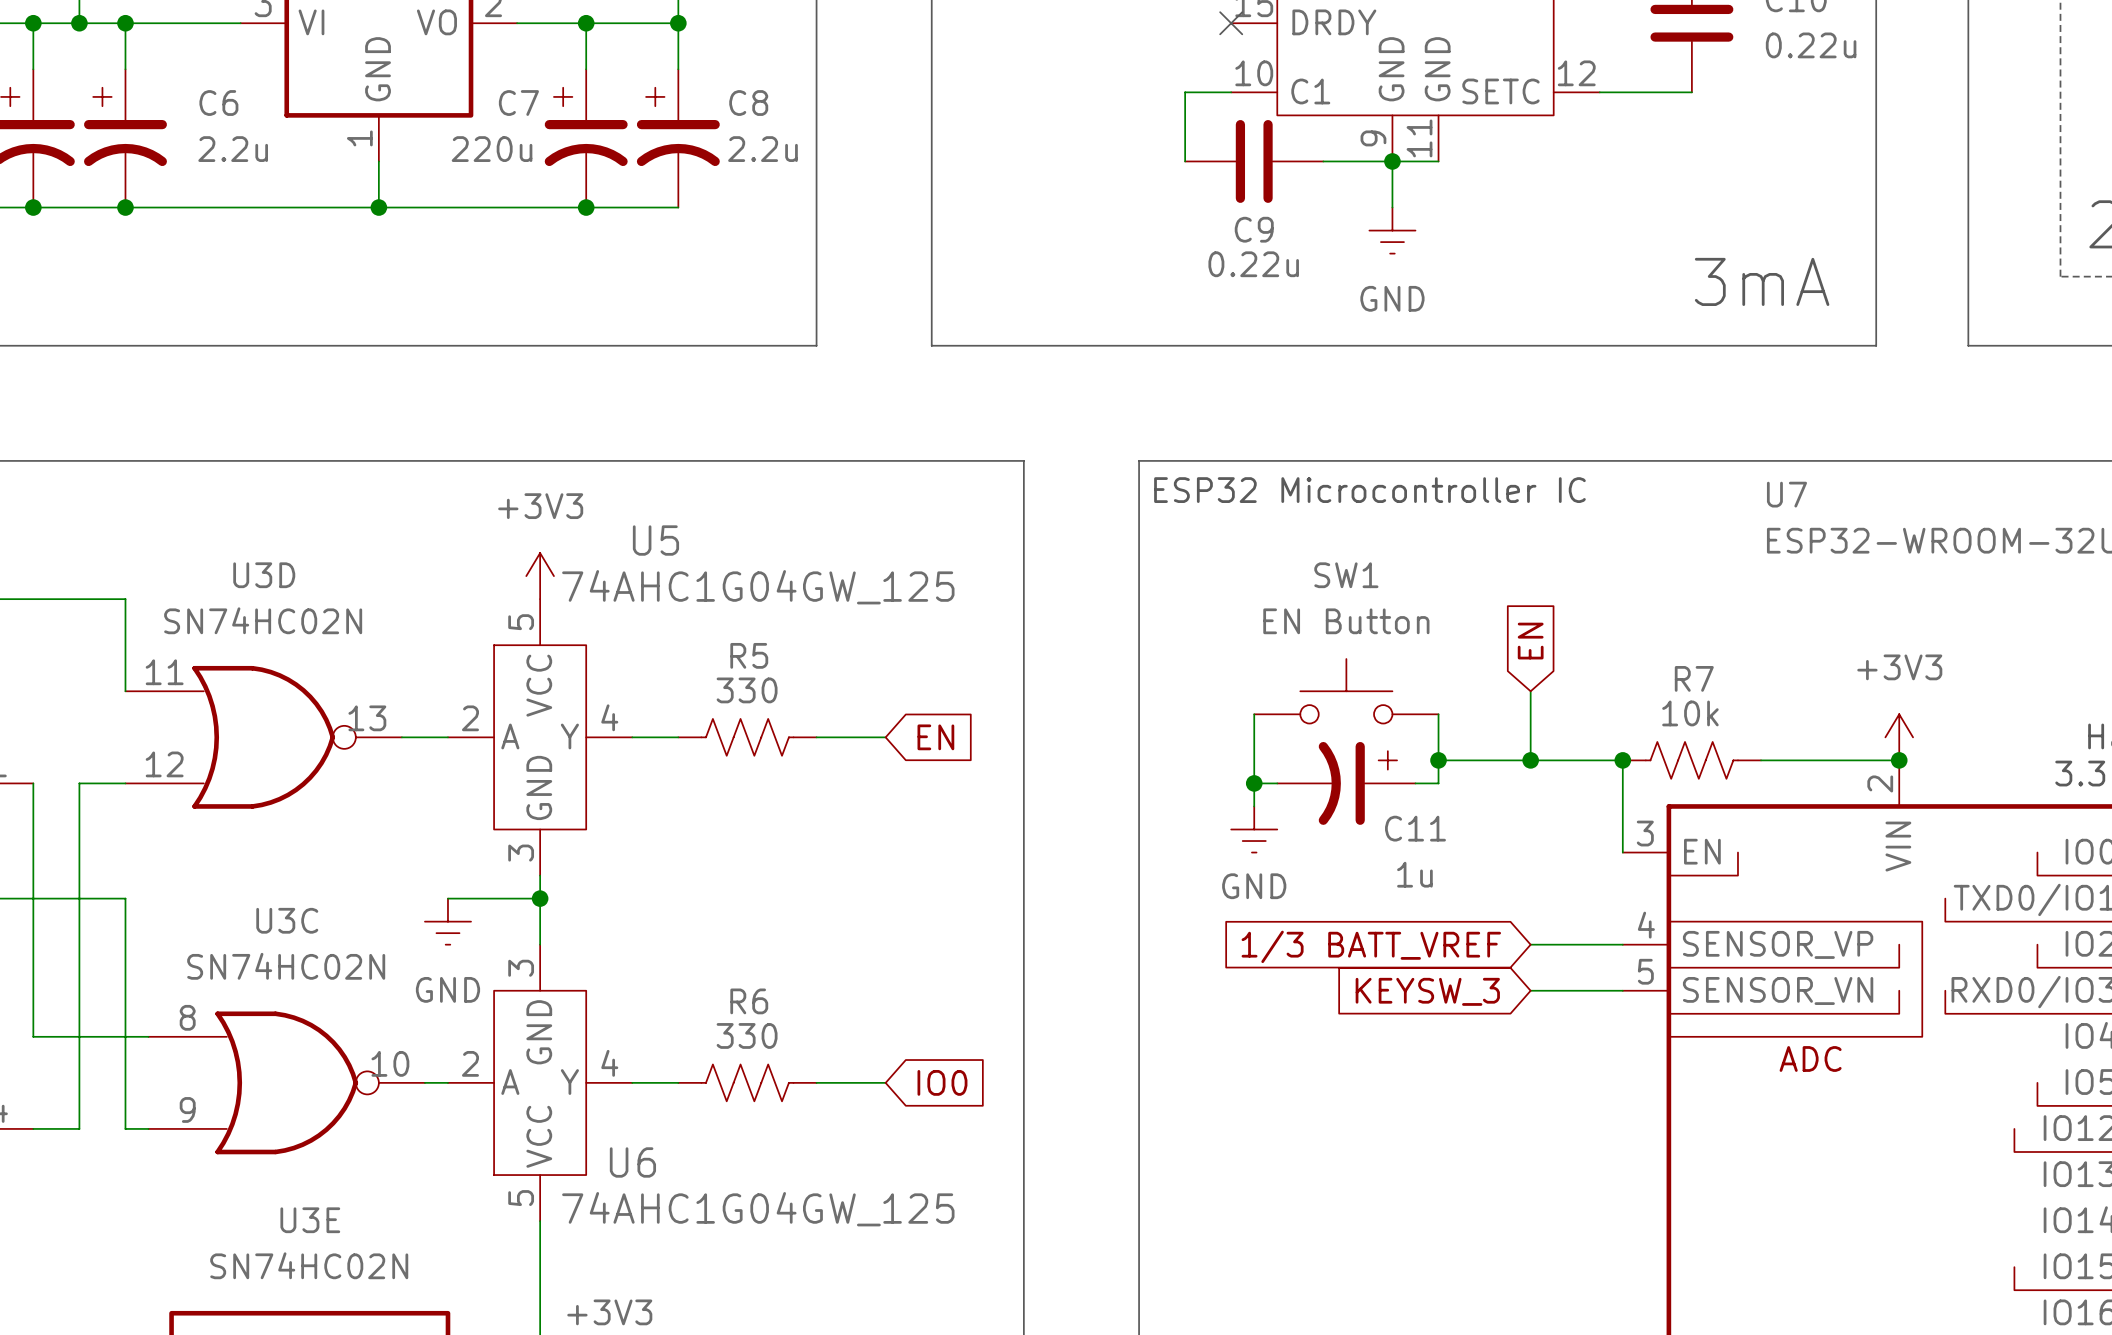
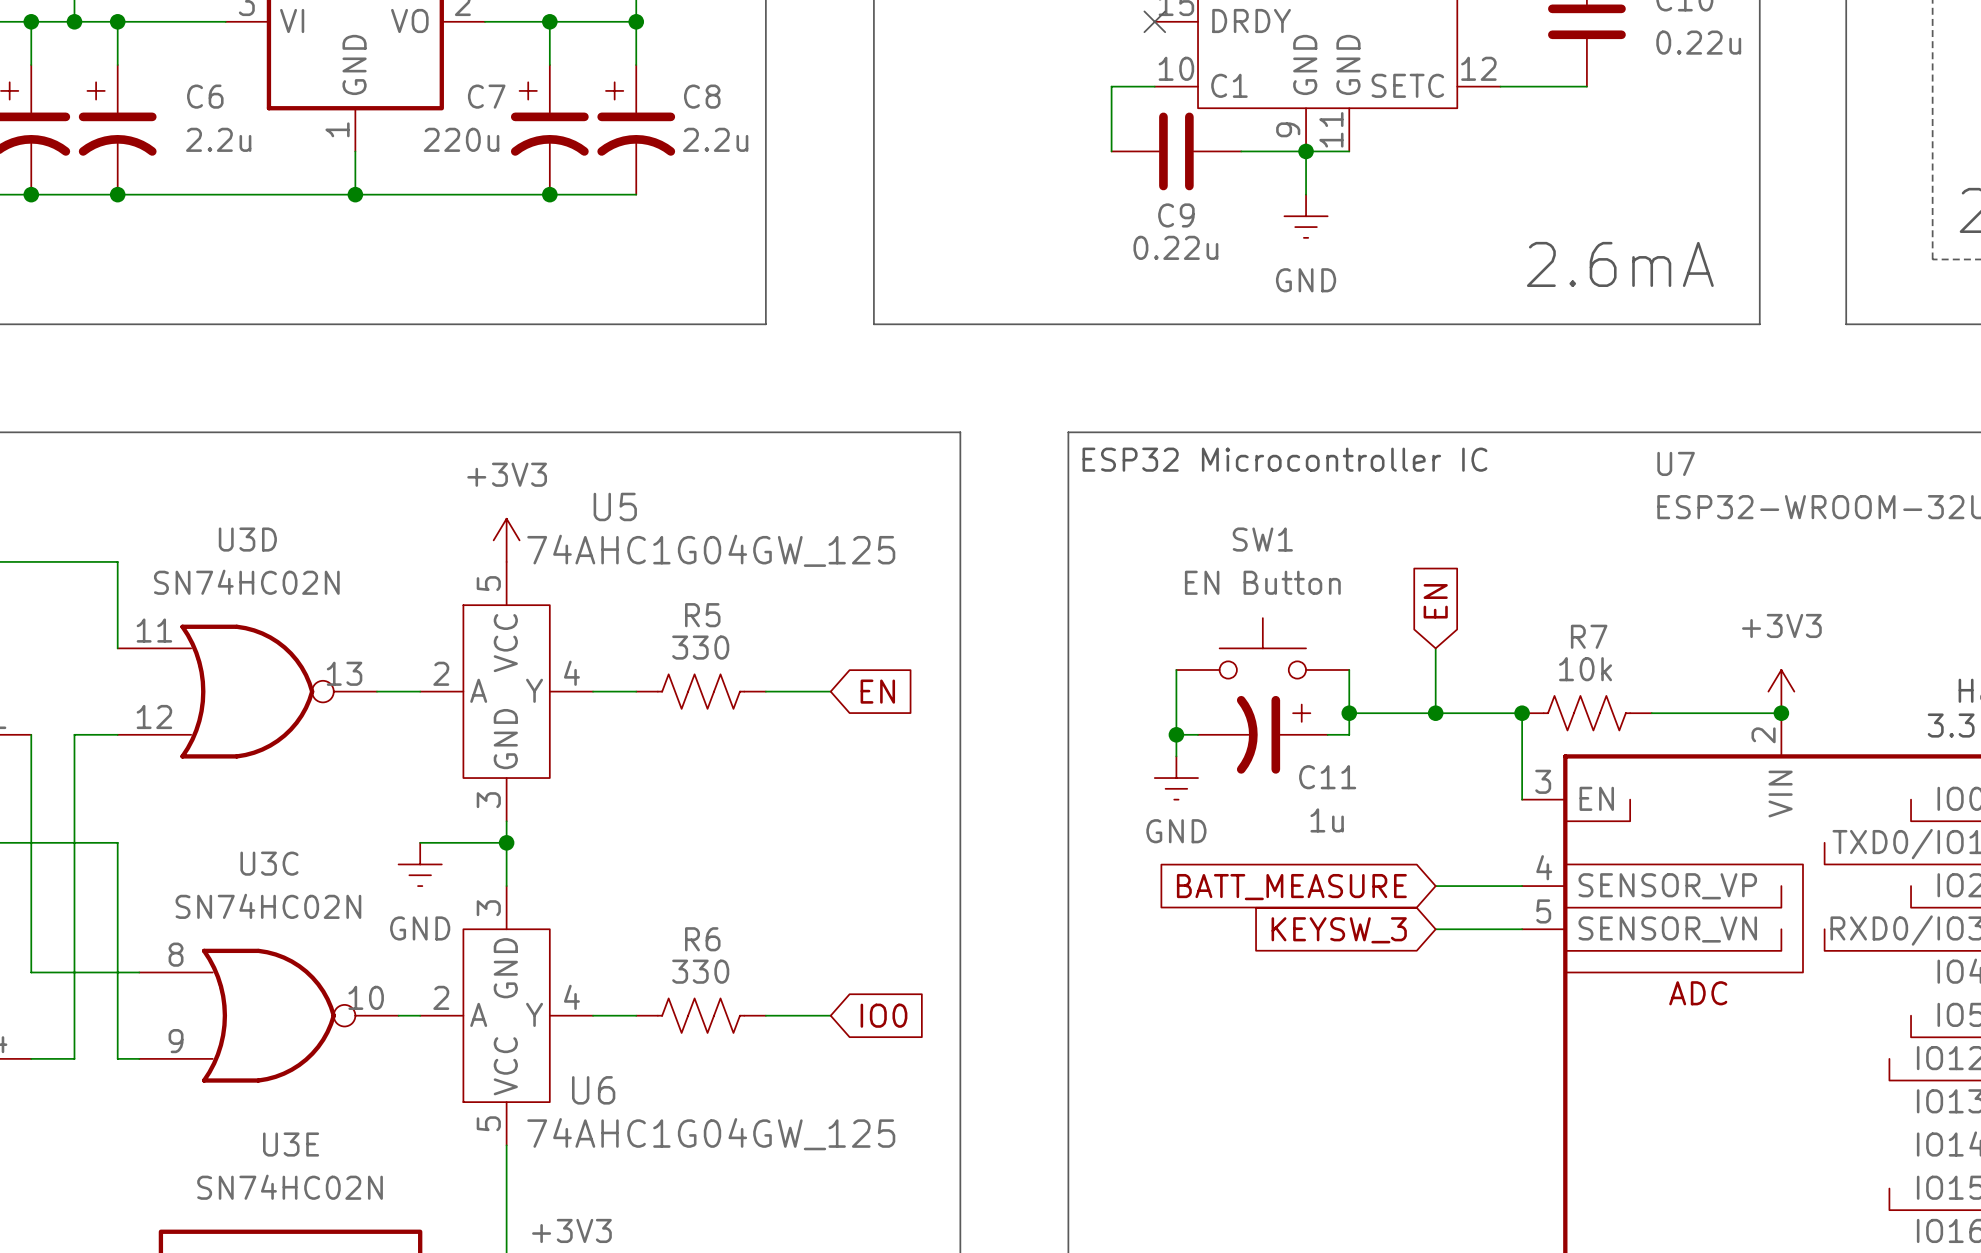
text: none -> 2.6mA (1620, 264)
text: 3mA (1762, 281) -> none
global label: 1/3 BATT_VREF (1371, 946) -> BATT_MEASURE (1291, 887)

